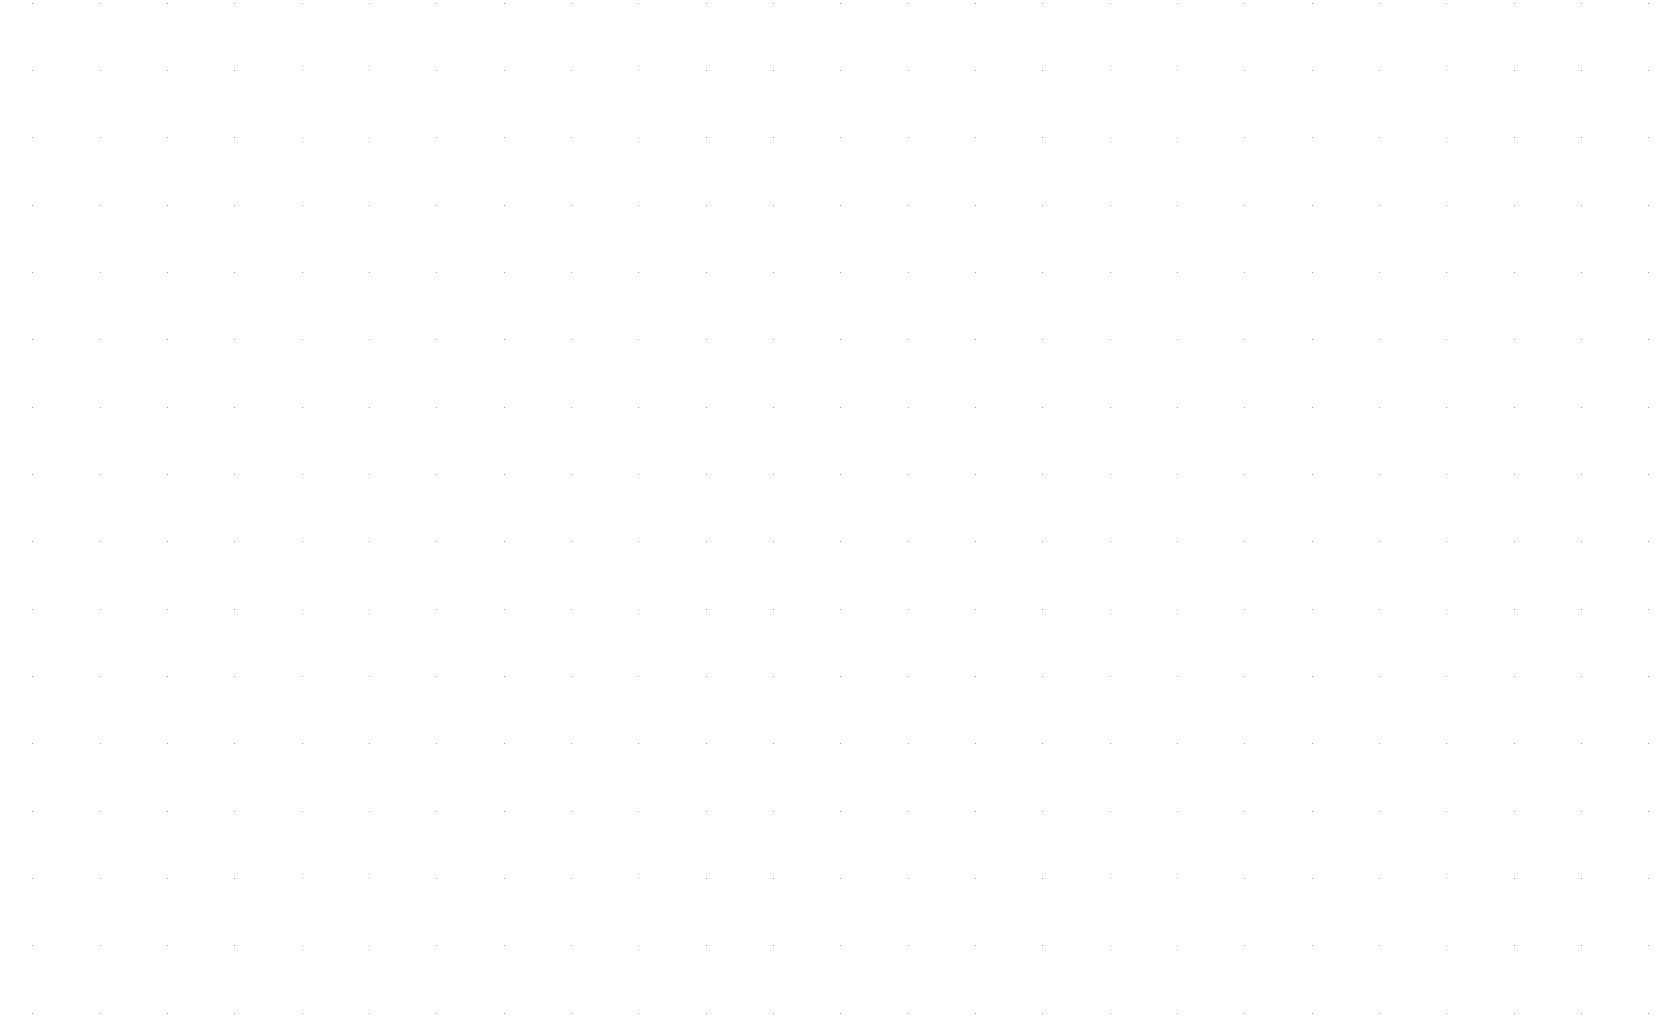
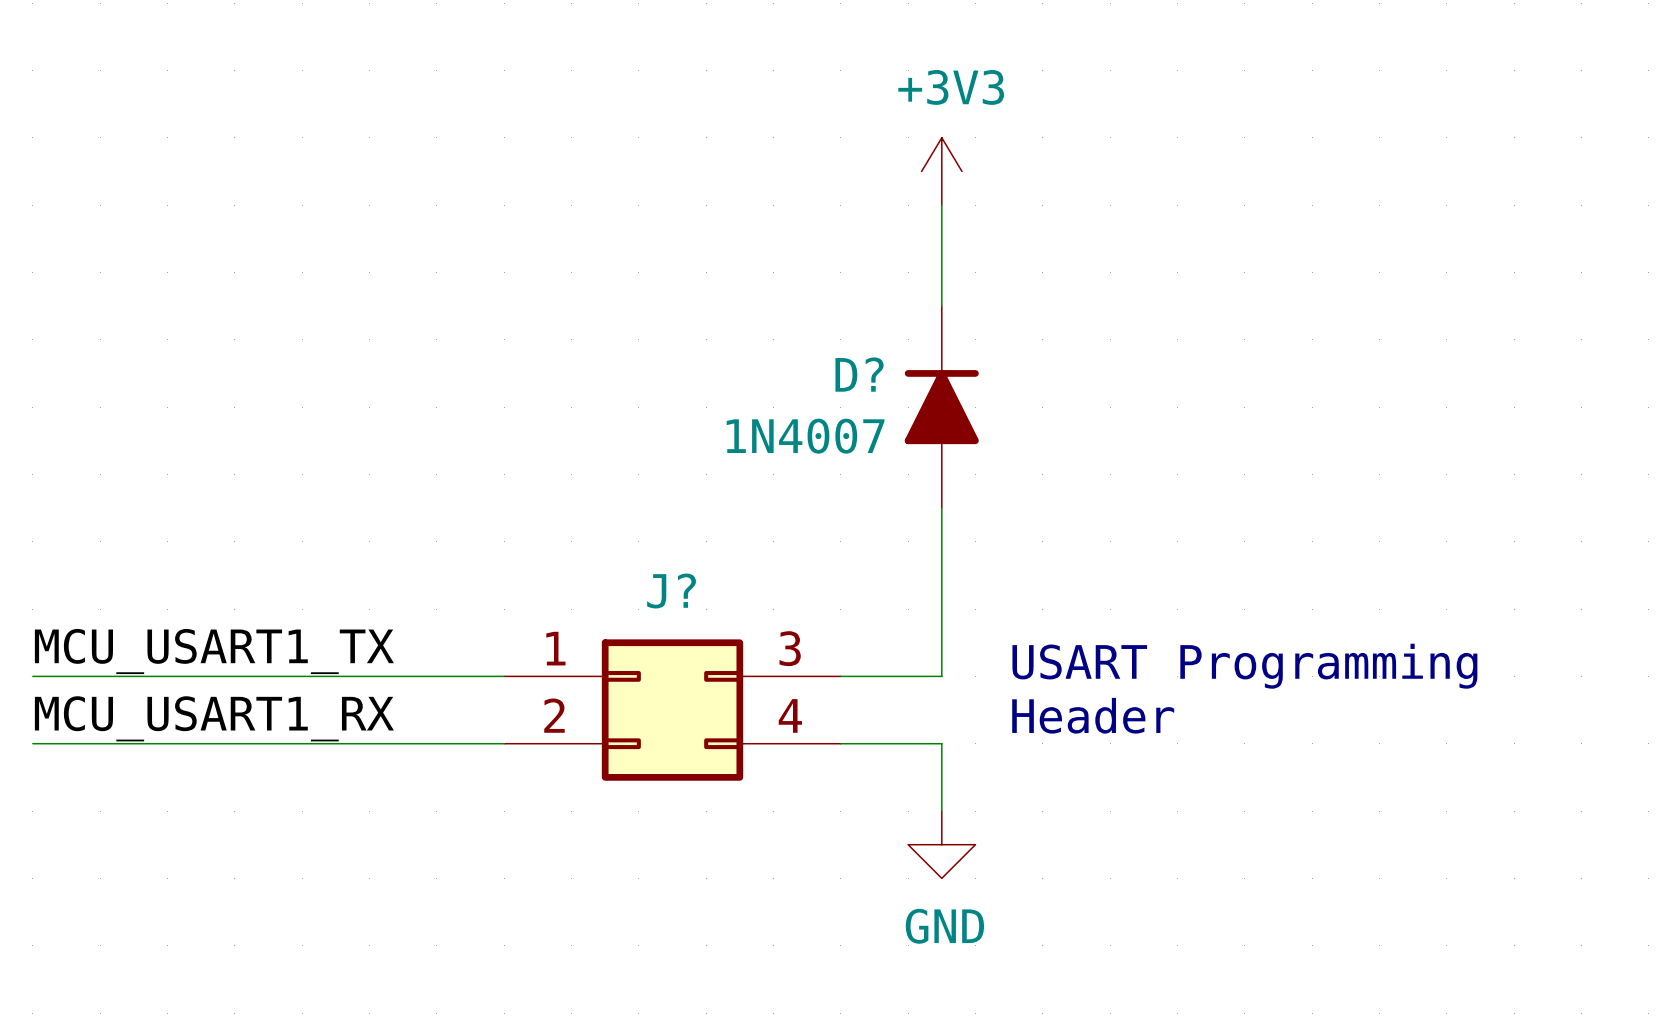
power symbol: none -> +3V3 (941, 171)
wire: none -> (941, 205) (941, 306)
D?: none -> 1N4007 (941, 407)
wire: none -> (941, 508) (941, 676) (840, 676)
label: none -> MCU_USART1_TX (214, 651)
text: none -> USART Programming (1244, 666)
wire: none -> (32, 676) (504, 676)
J?: none -> (672, 710)
text: none -> Header (1093, 715)
label: none -> MCU_USART1_RX (214, 718)
wire: none -> (32, 743) (504, 743)
wire: none -> (840, 743) (941, 743) (941, 811)
power symbol: none -> GND (941, 844)

